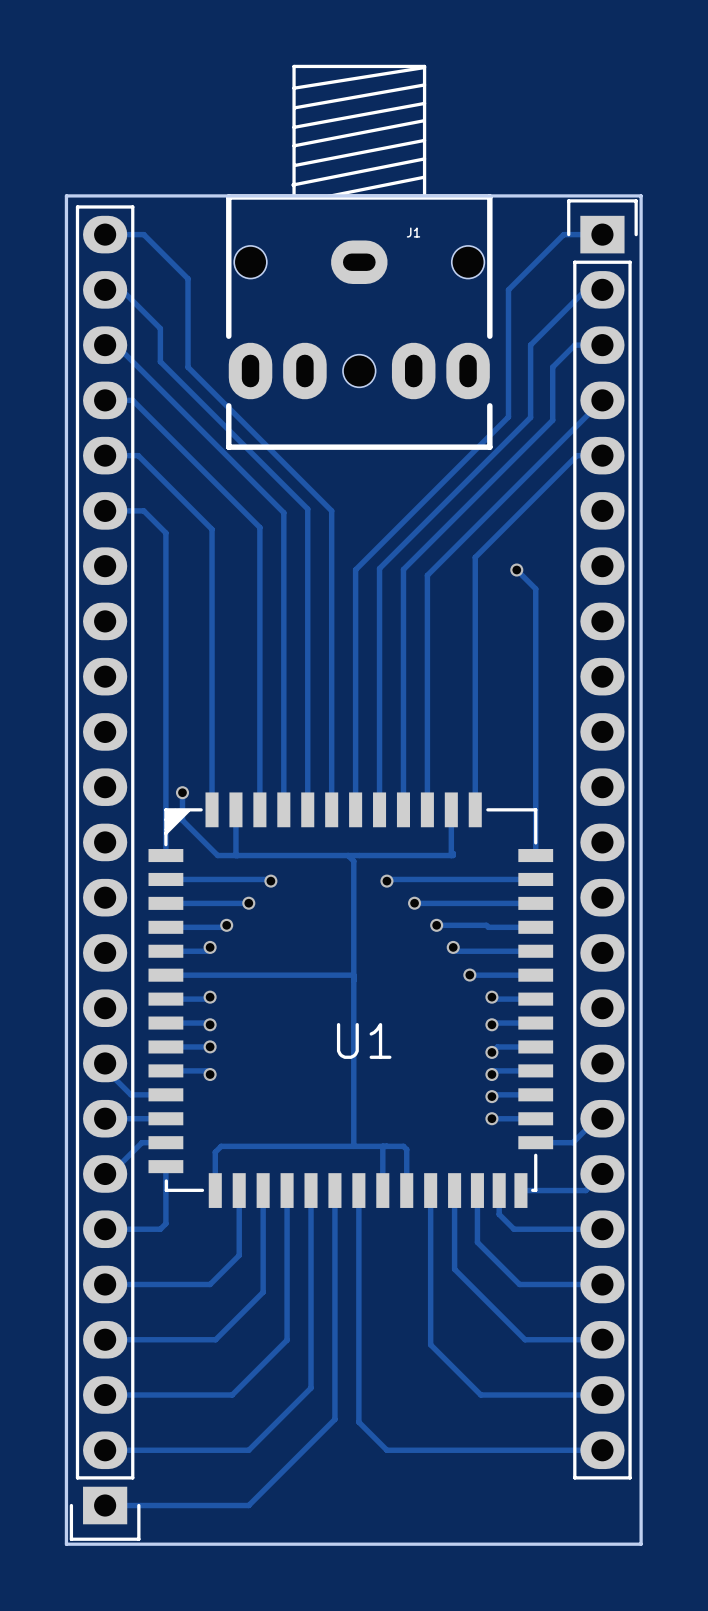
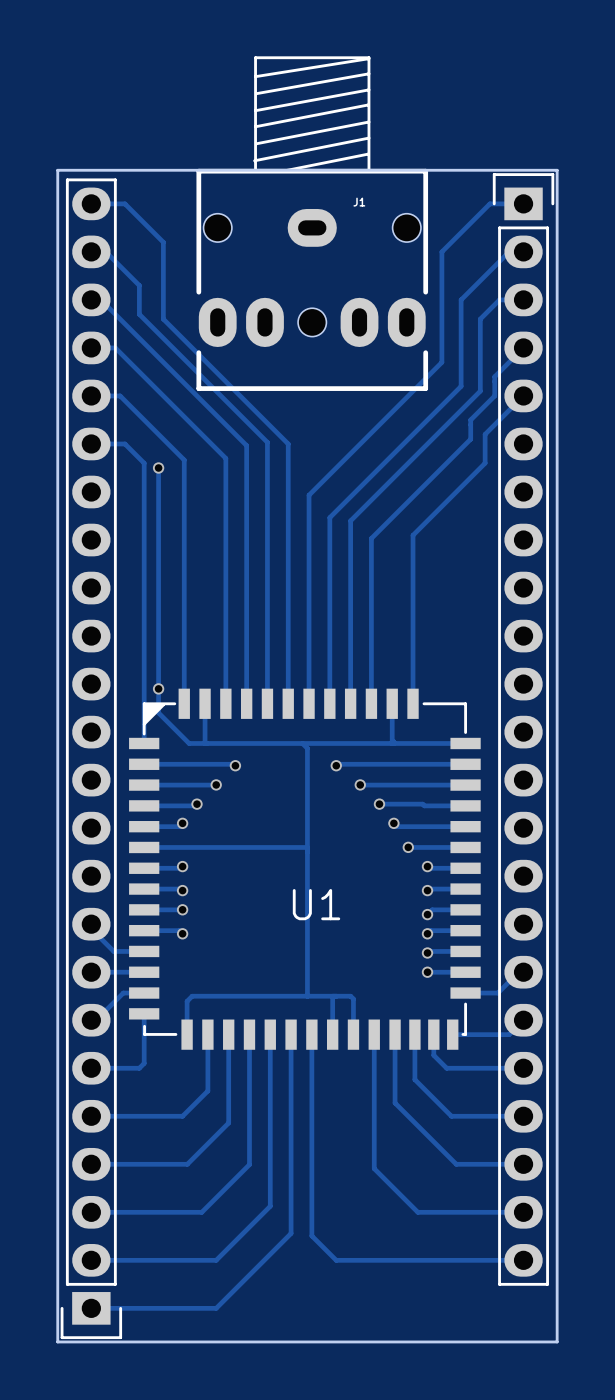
track: (530, 417) (379, 568) (379, 595) -> (461, 362) (461, 386) (329, 517)
track: (552, 420) (403, 569) (403, 599) -> none
track: (569, 433) (552, 450) -> (480, 365) (480, 391)
track: none -> (494, 376) (494, 395) (470, 419) (470, 439) (371, 538)
track: (602, 455) (577, 455) (475, 557) (475, 615) -> (523, 395) (485, 434) (485, 463) (413, 535)
track: none -> (158, 468) (158, 688)
via: none -> (158, 468)
track: (516, 570) (535, 588) (535, 855) -> (393, 743) (465, 743)
via: (516, 570) -> none
track: (427, 575) (427, 619) -> (371, 500) (350, 520)

